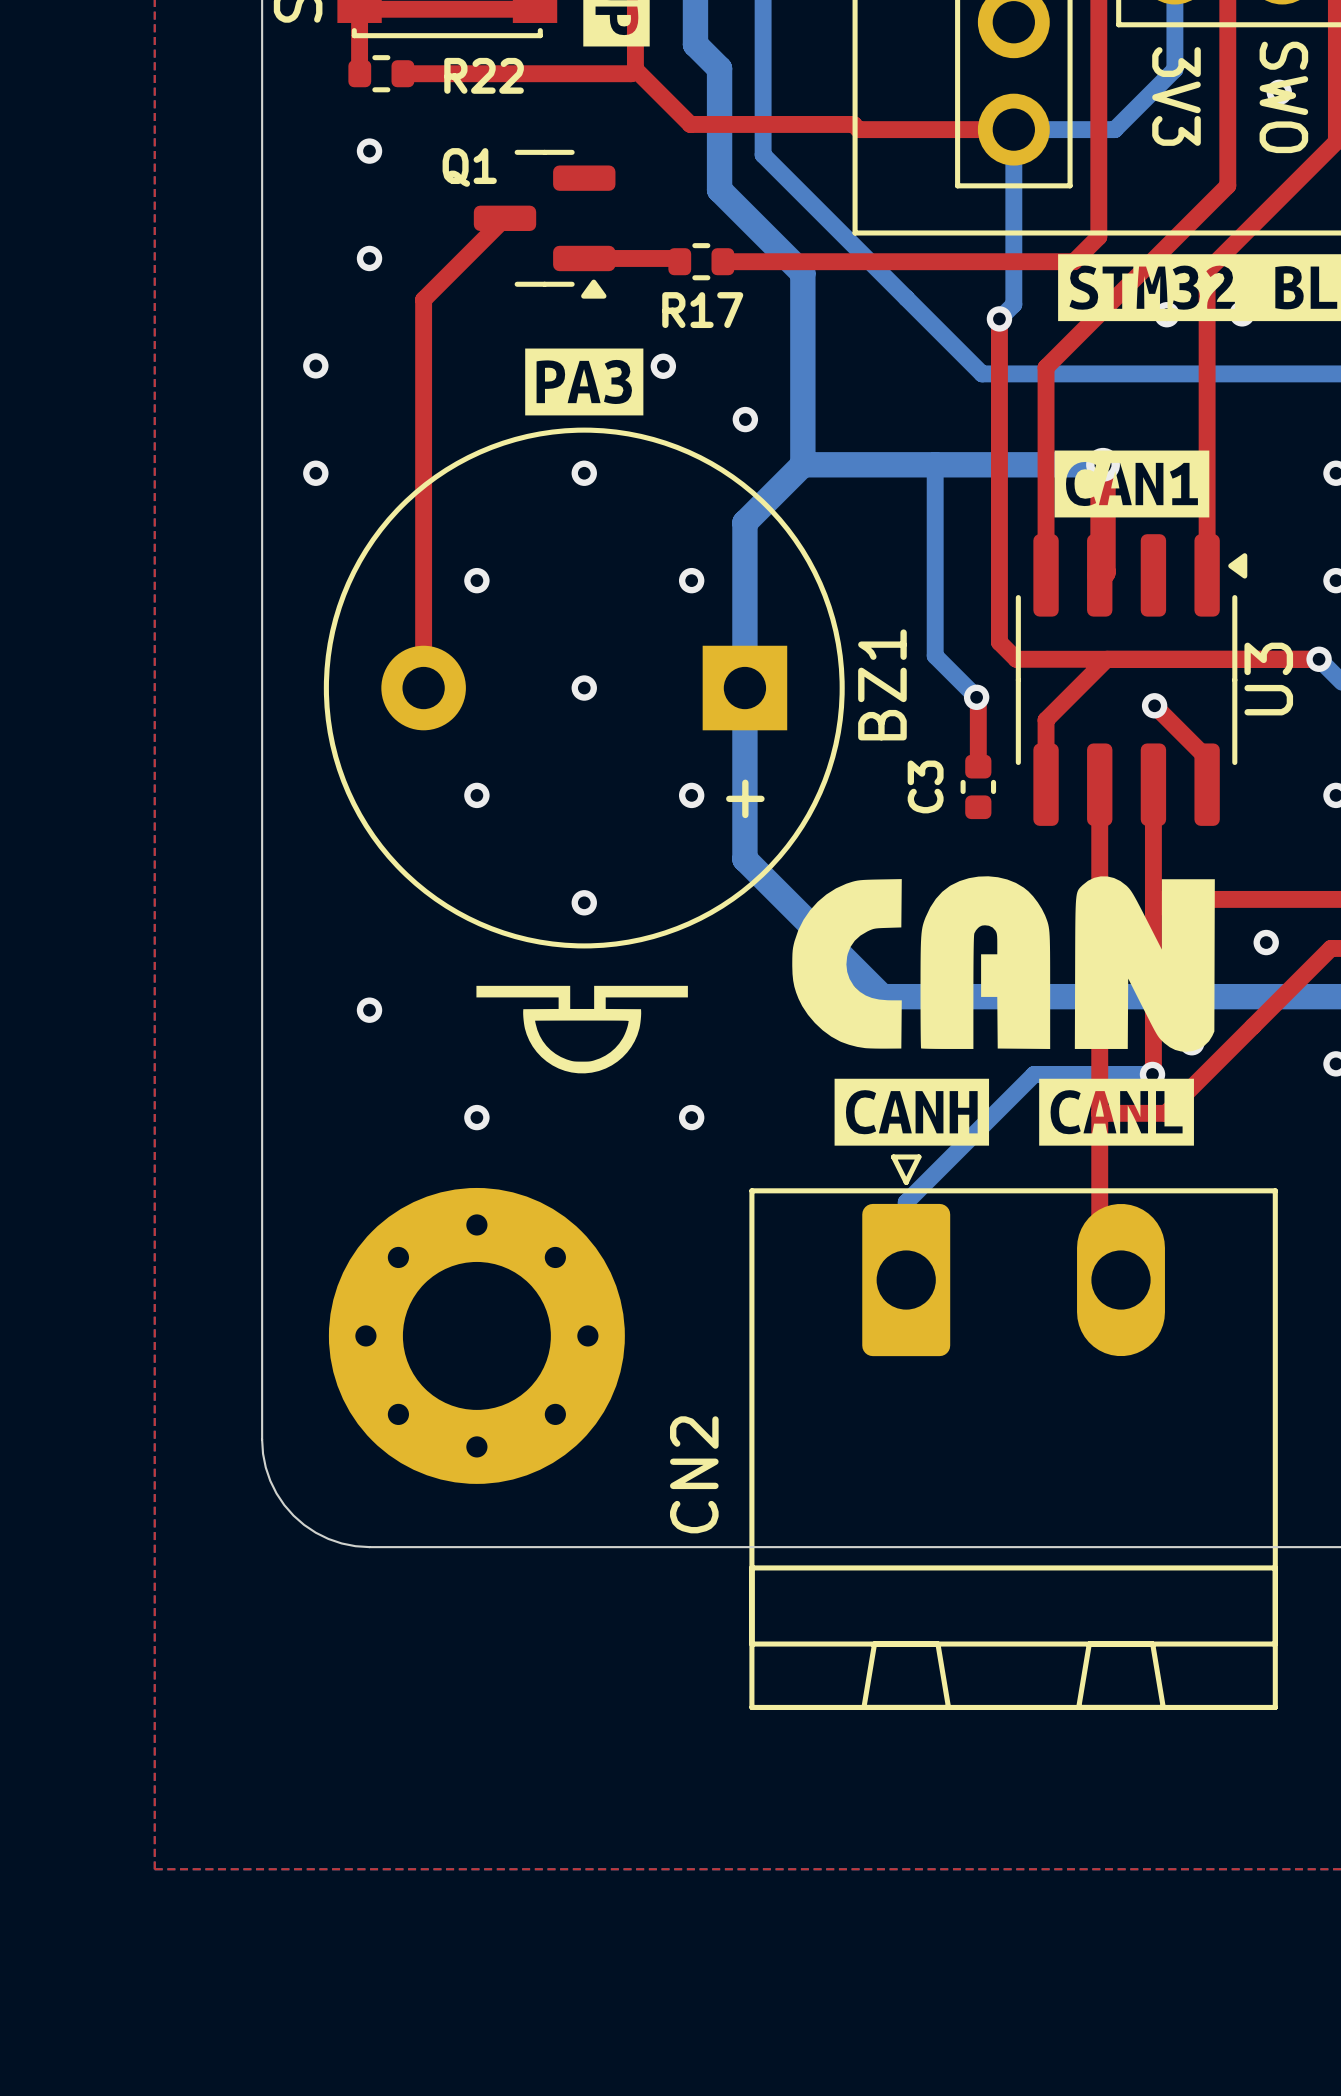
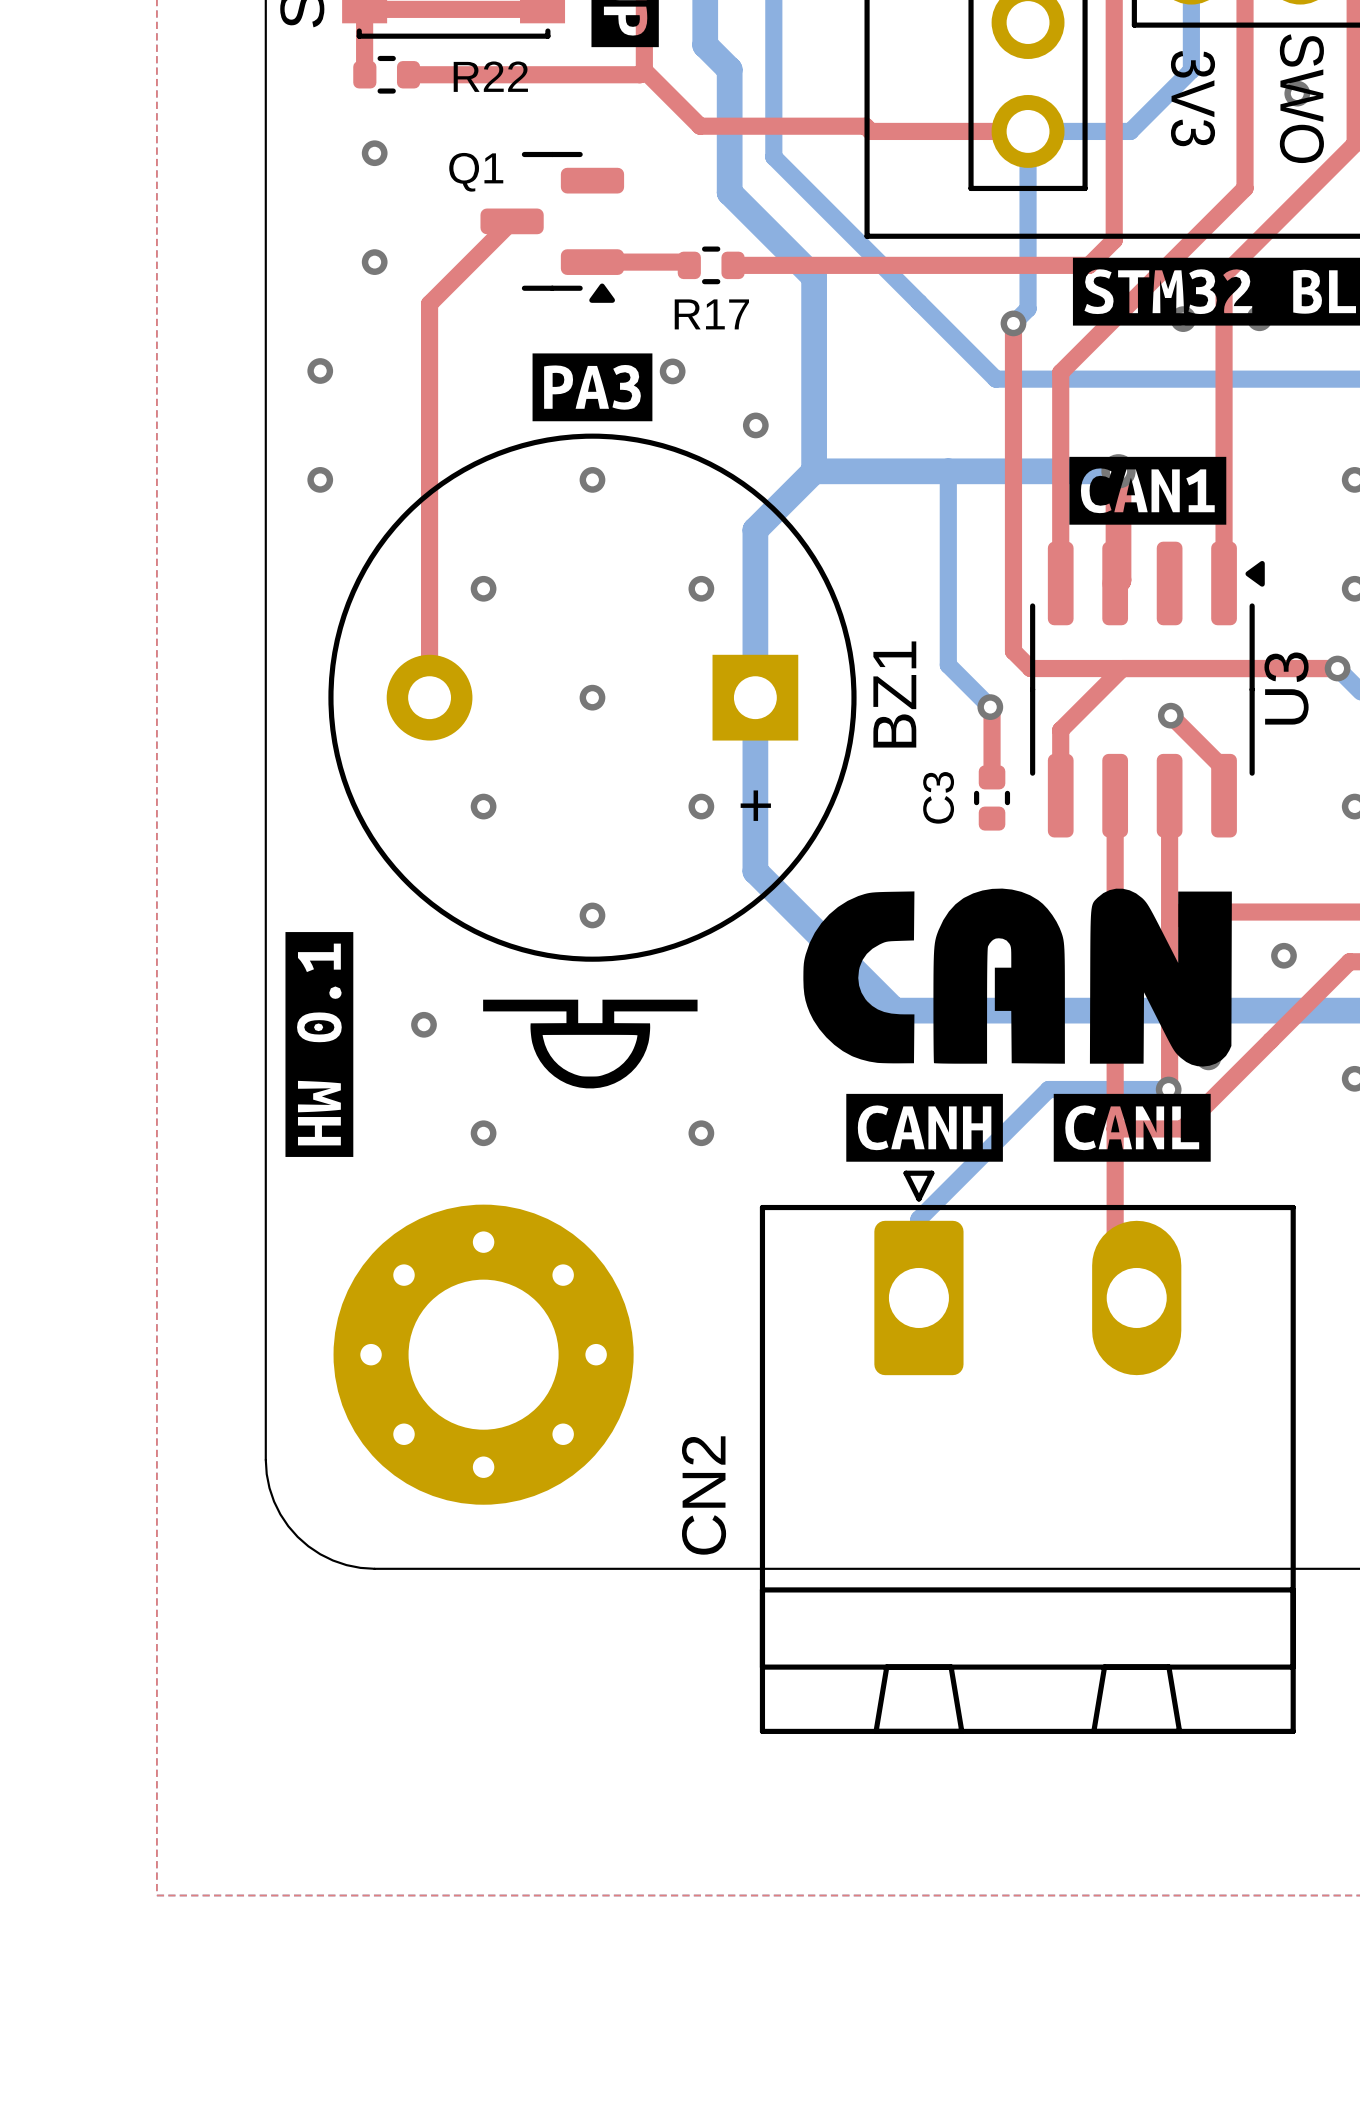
drawing: none -> [285, 932, 354, 1157]
via position: (369, 1010) -> (423, 1024)

